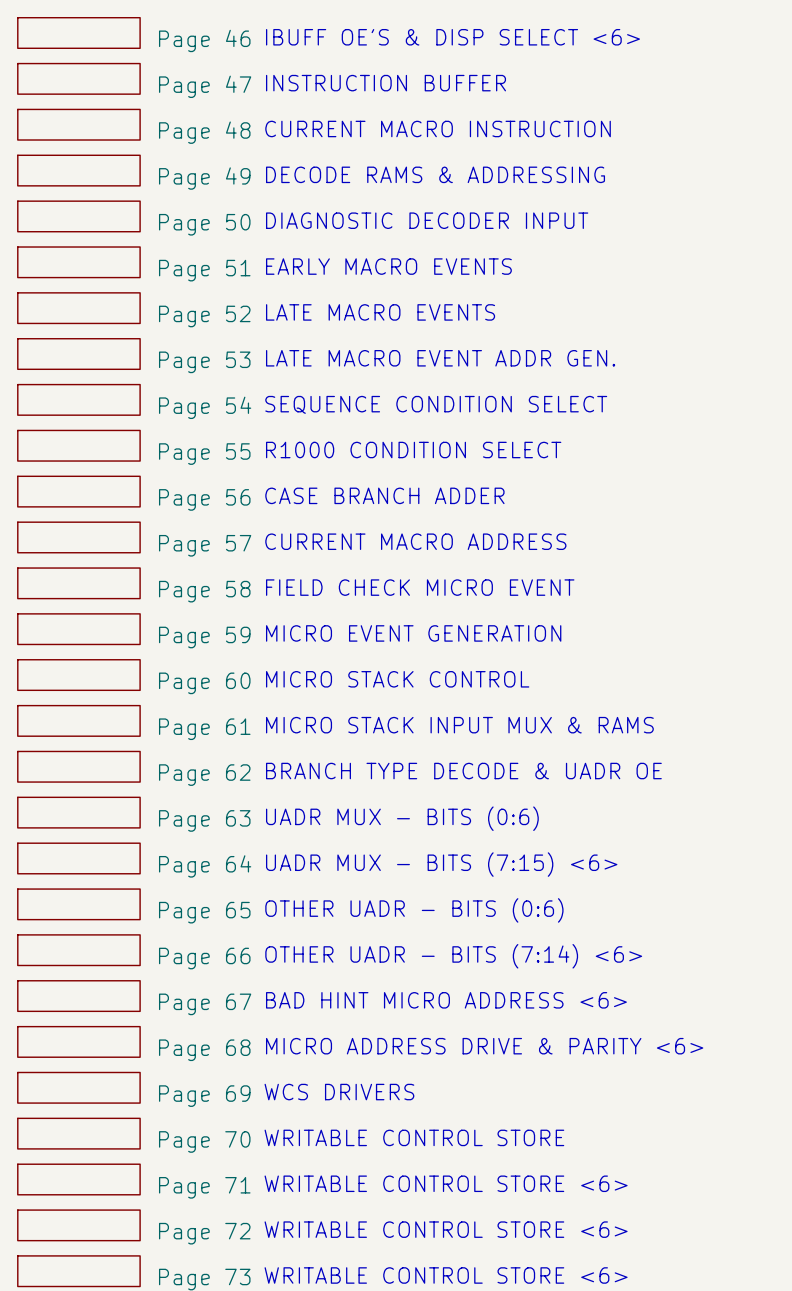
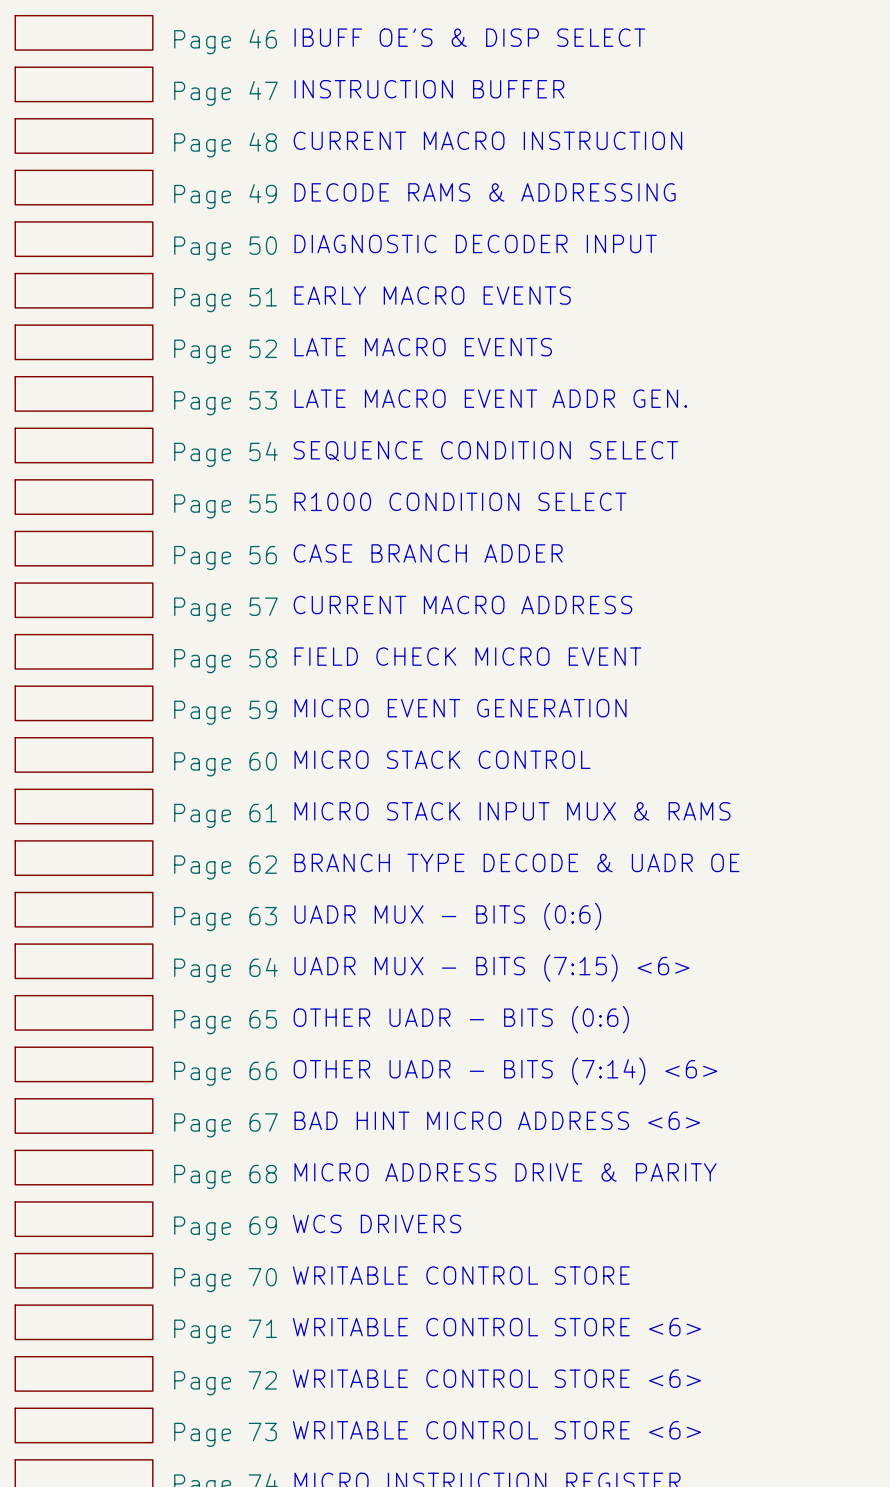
text: IBUFF OE'S & DISP SELECT <6> (452, 37) -> IBUFF OE'S & DISP SELECT (469, 37)
text: MICRO ADDRESS DRIVE & PARITY <6> (484, 1046) -> MICRO ADDRESS DRIVE & PARITY (505, 1172)

